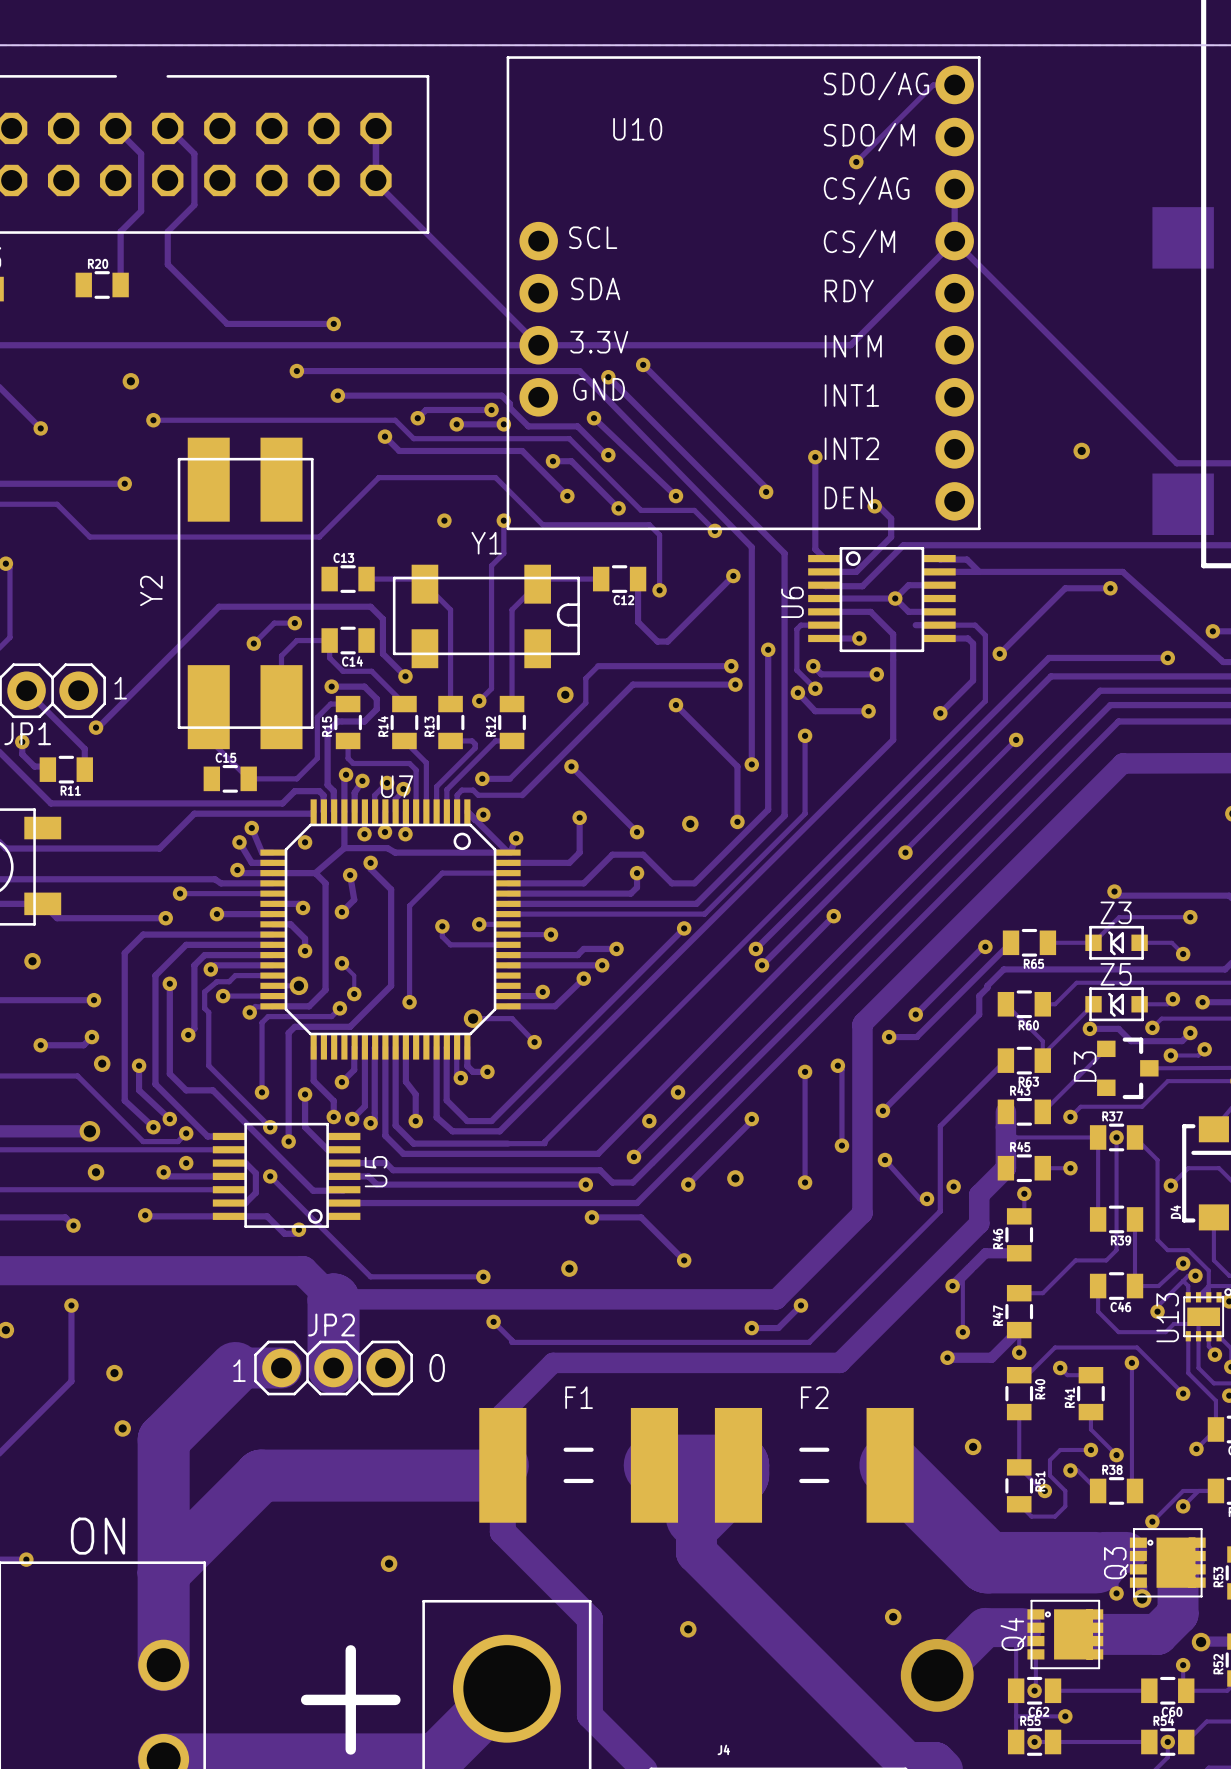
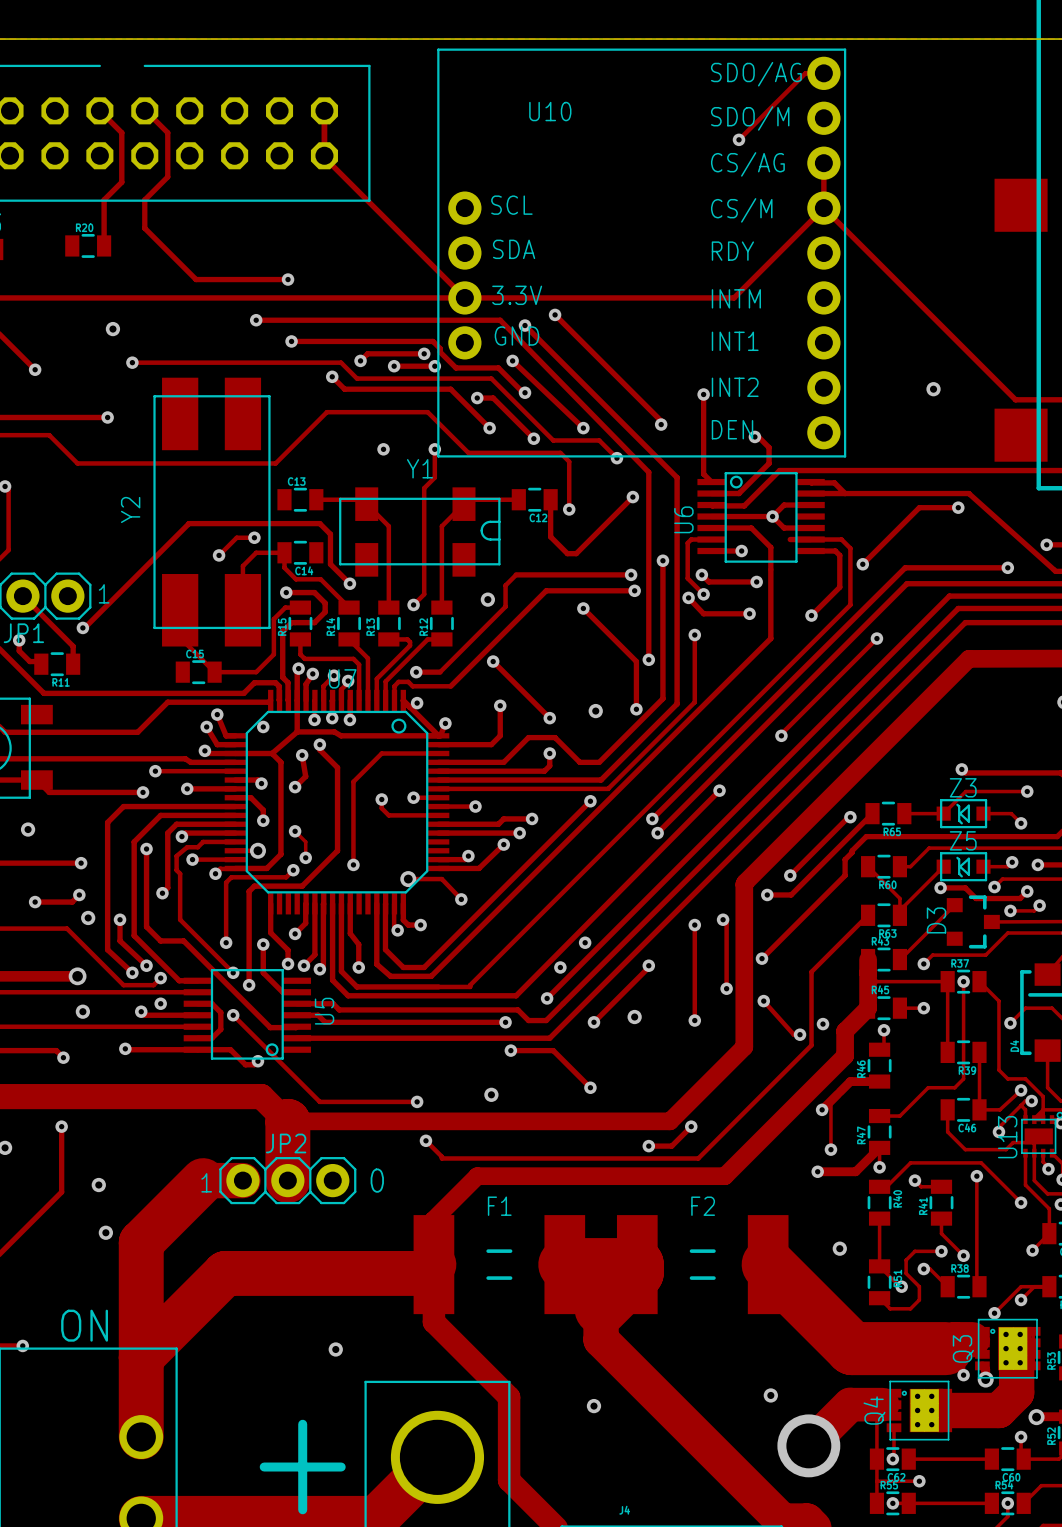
Q3 footprint: [1129, 1528, 1206, 1598] -> [975, 1319, 1041, 1379]
Q4 footprint: [1027, 1600, 1104, 1669] -> [886, 1381, 953, 1441]

